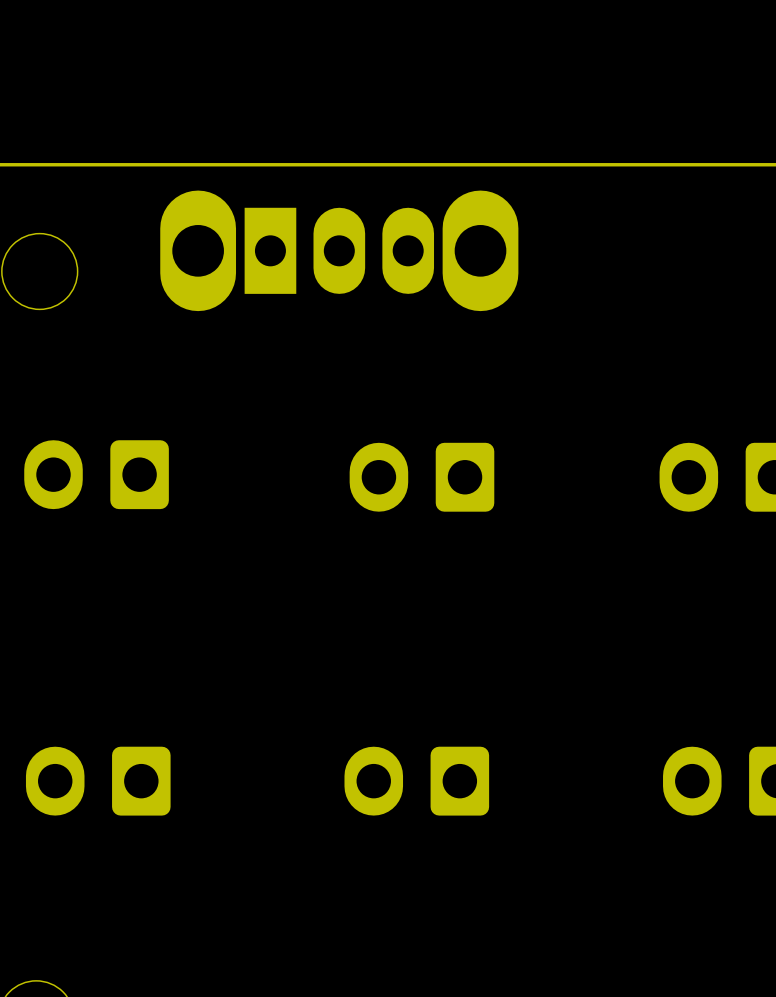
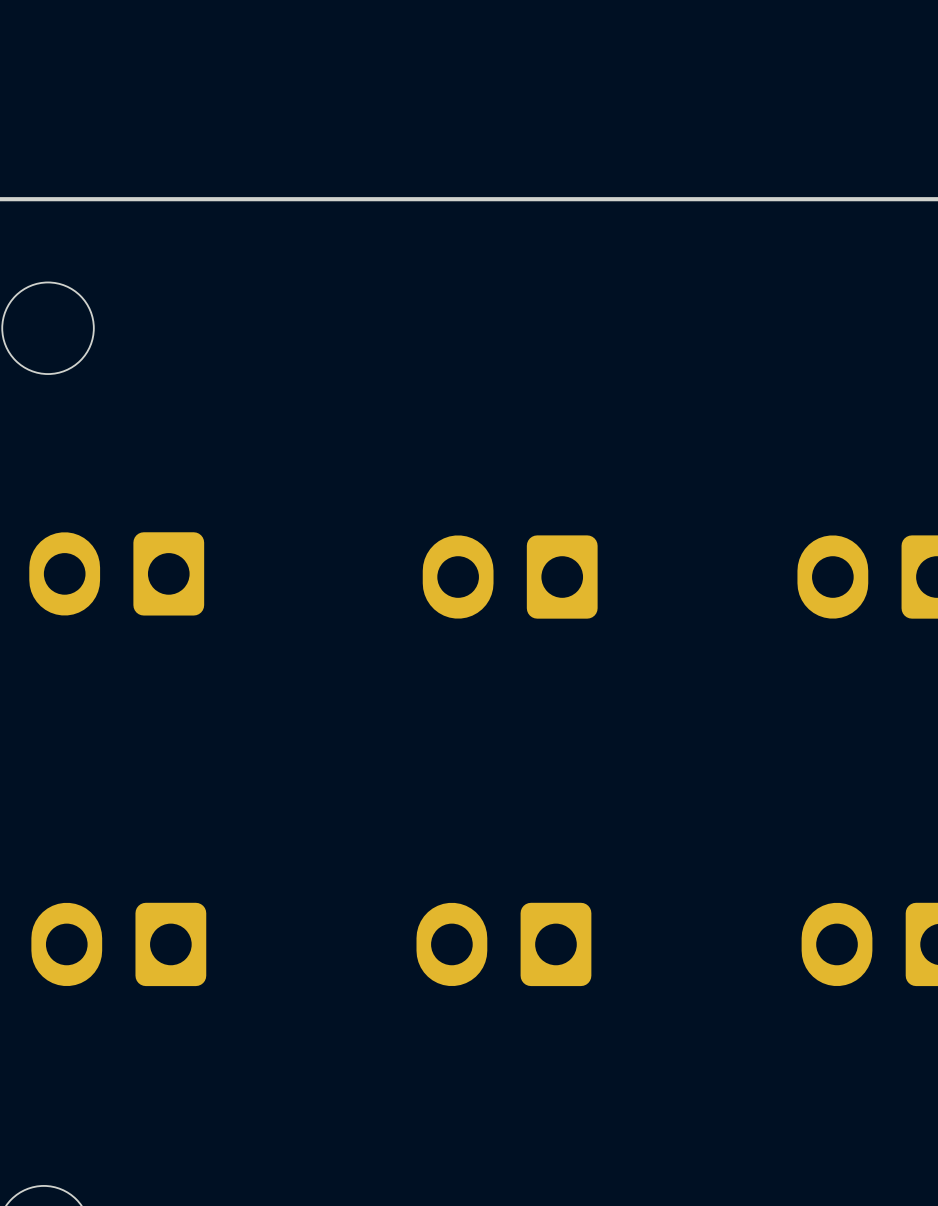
part: (339, 250) -> none

